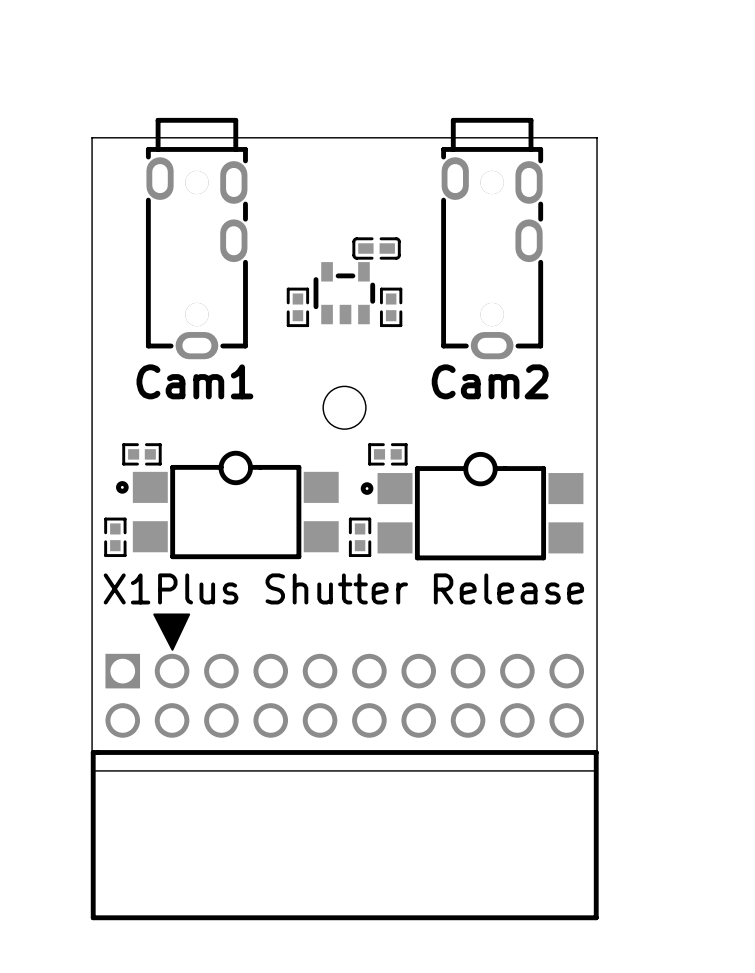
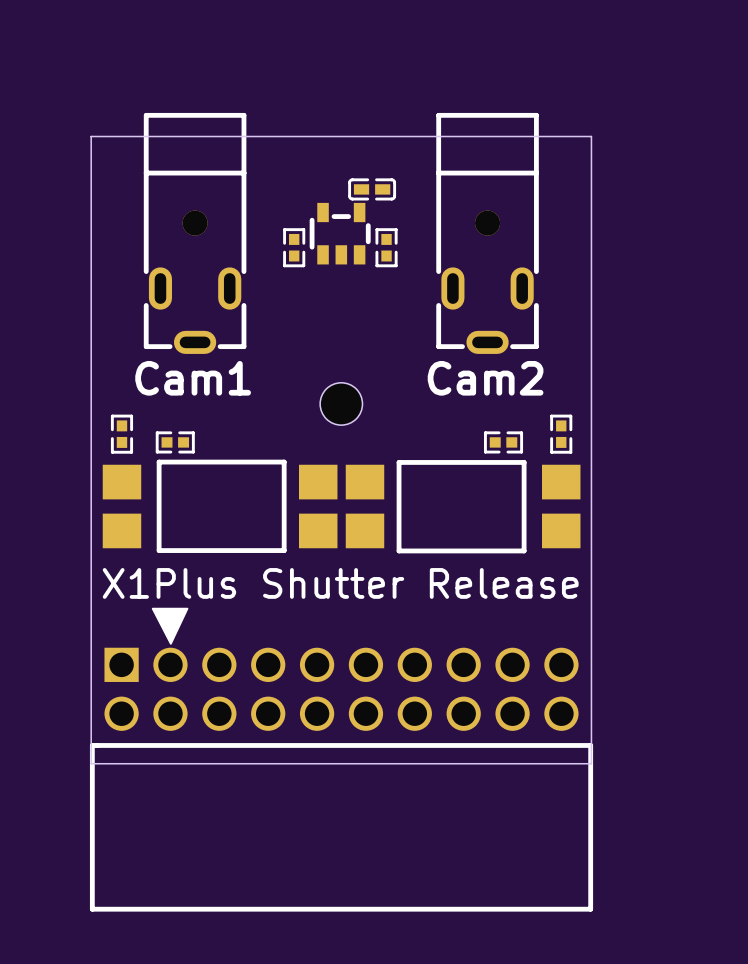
part footprint: [145, 117, 248, 360] -> [143, 112, 247, 354]
part footprint: [441, 117, 544, 360] -> [436, 112, 539, 354]
part: none -> (372, 189)
part footprint: [352, 237, 401, 260] -> [375, 228, 398, 268]
part: none -> (294, 247)
part position: (344, 293) -> (340, 233)
part: (297, 307) -> none
part: (391, 307) -> none
part: none -> (121, 434)
part: none -> (561, 434)
part: none -> (175, 442)
part: none -> (503, 442)
part footprint: [116, 450, 339, 560] -> [102, 459, 338, 553]
part footprint: [360, 451, 584, 561] -> [345, 460, 581, 554]
part: (141, 454) -> none
part: (387, 454) -> none
part: (115, 537) -> none
part: (360, 537) -> none

